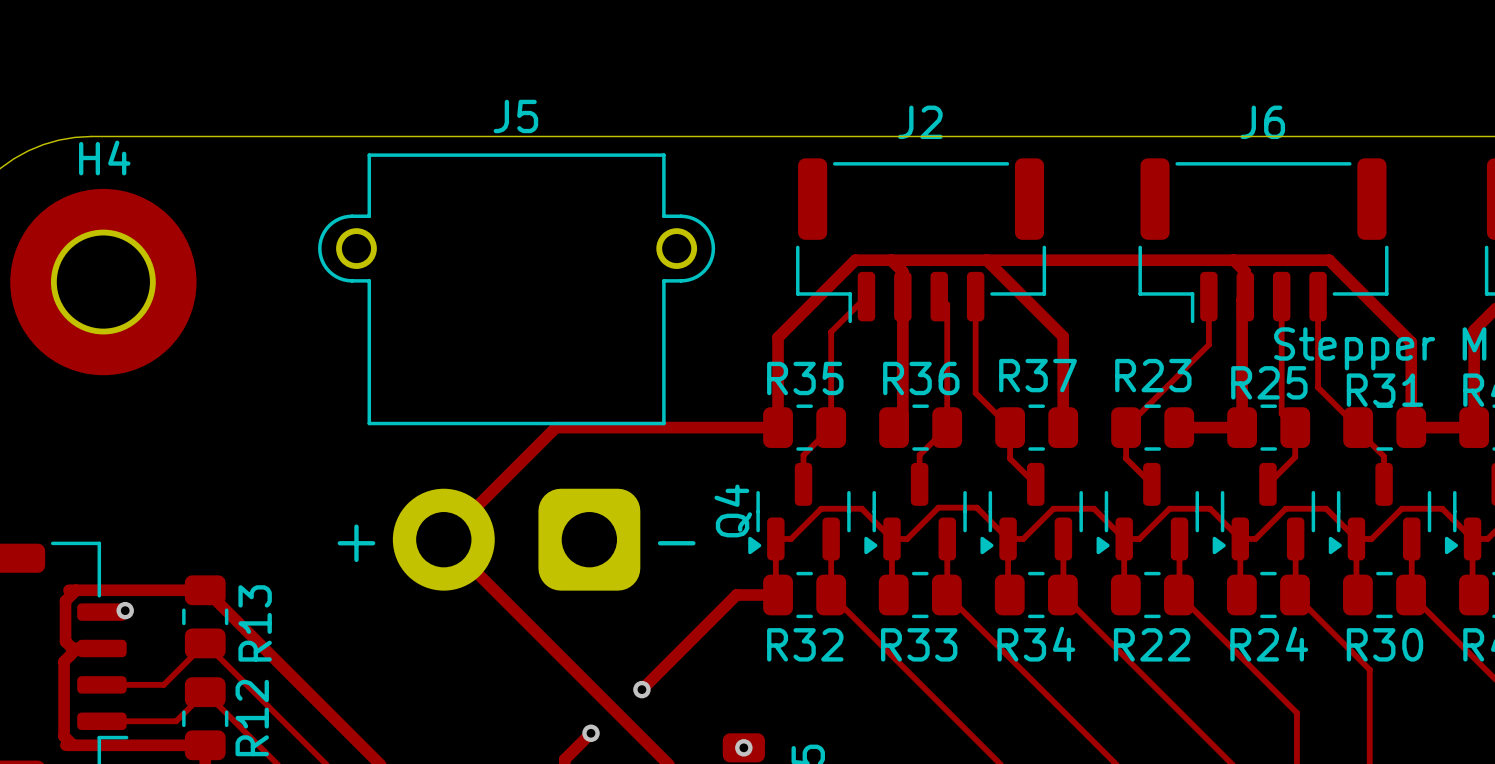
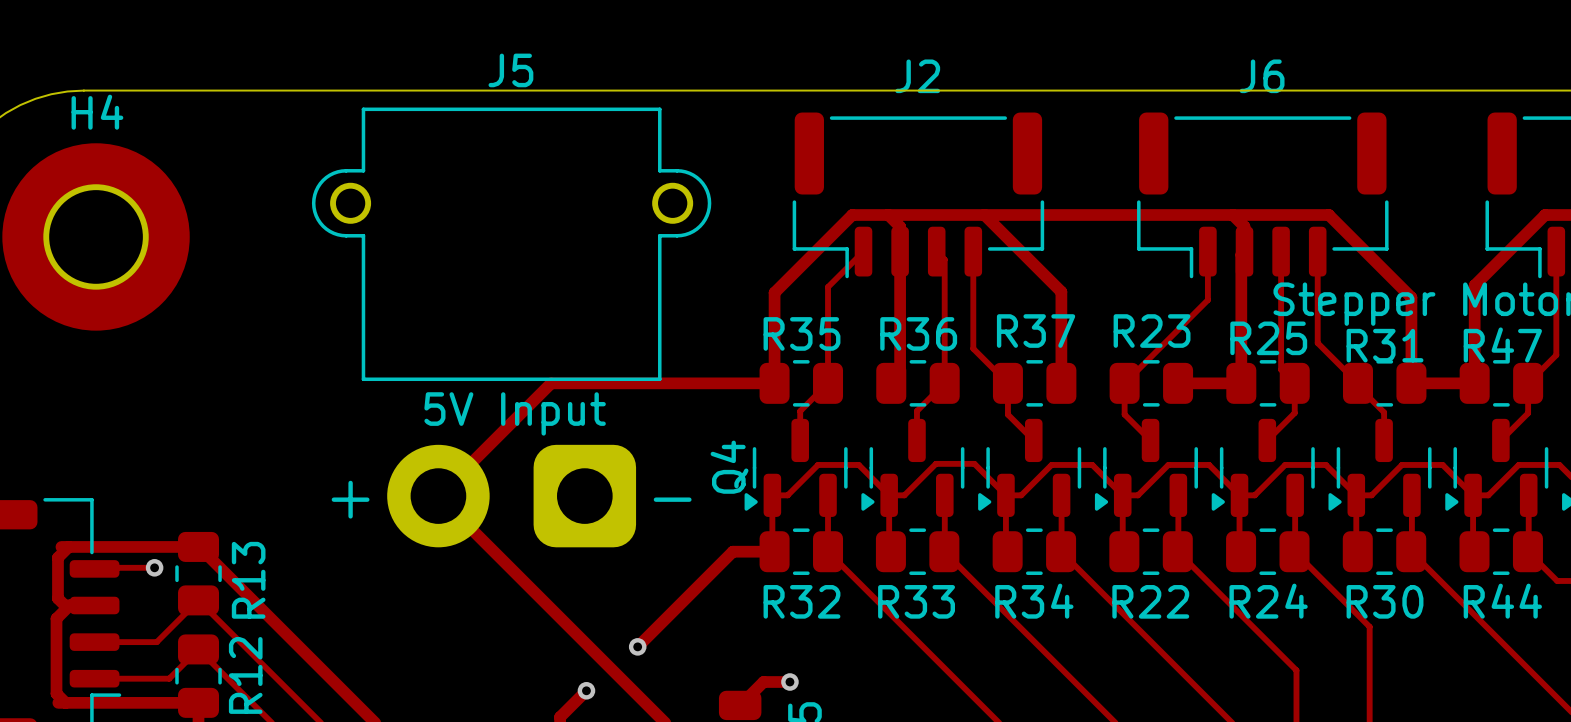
text: none -> 5V Input (515, 413)
via position: (125, 610) -> (154, 567)
track: none -> (117, 567) (154, 567)
track: none -> (789, 682) (763, 682) (740, 705)
via position: (743, 747) -> (789, 682)

